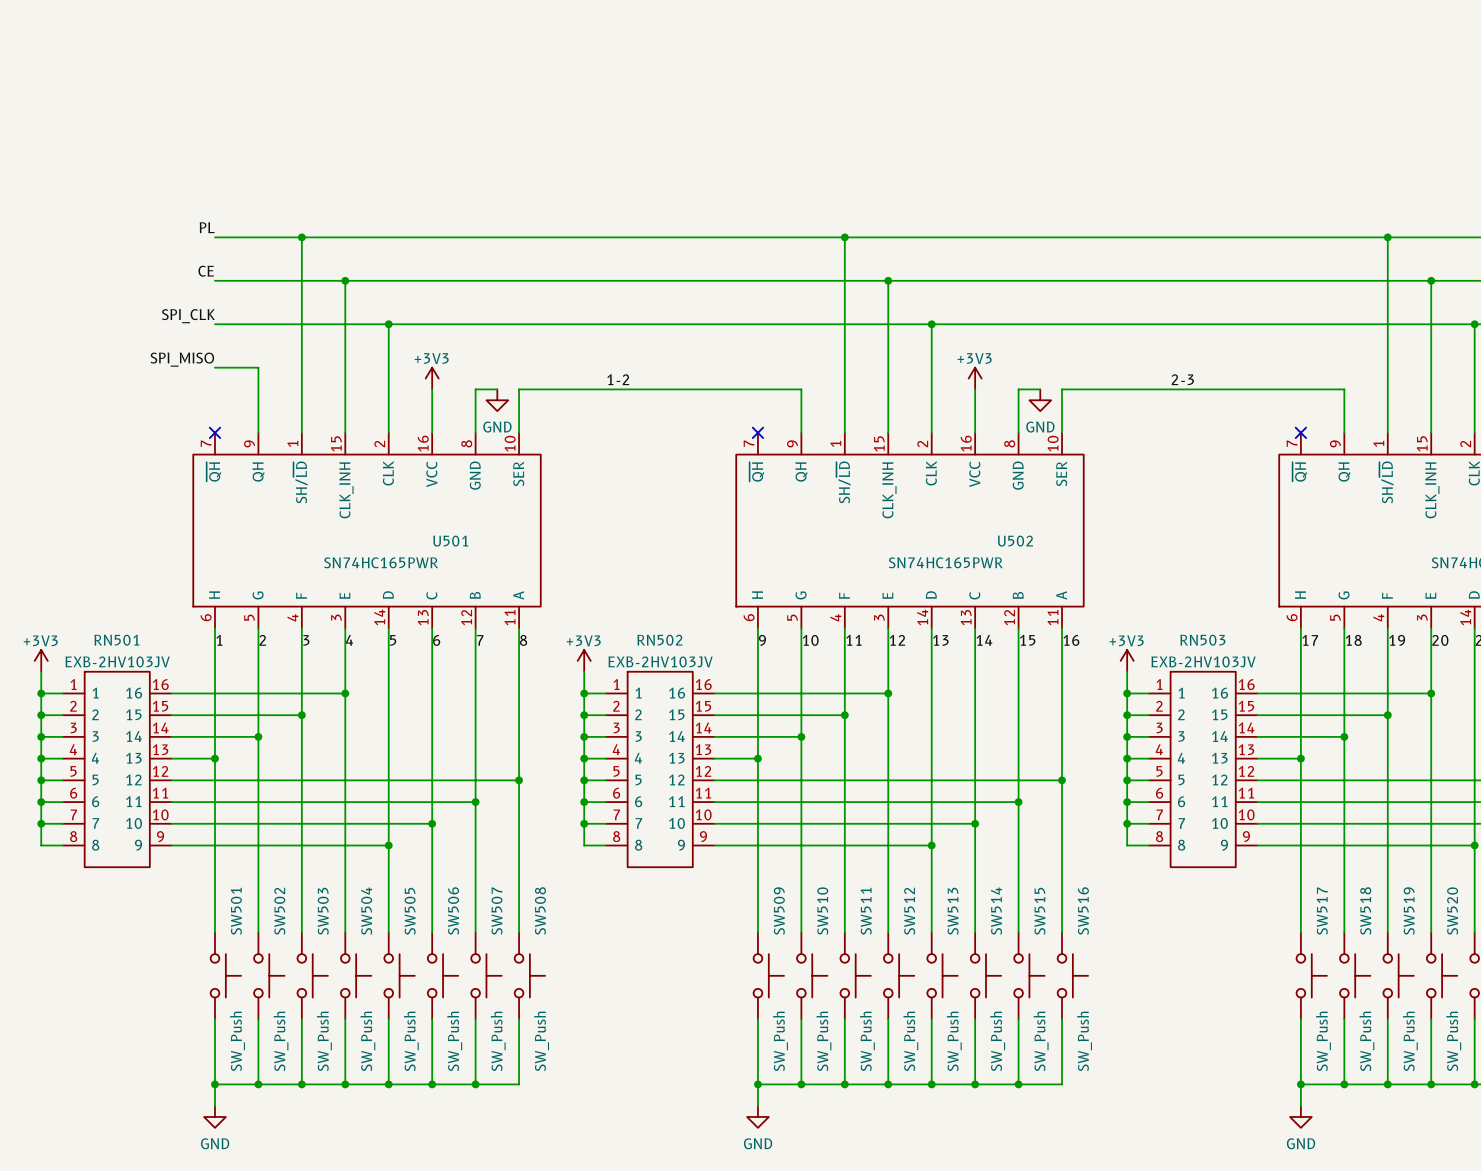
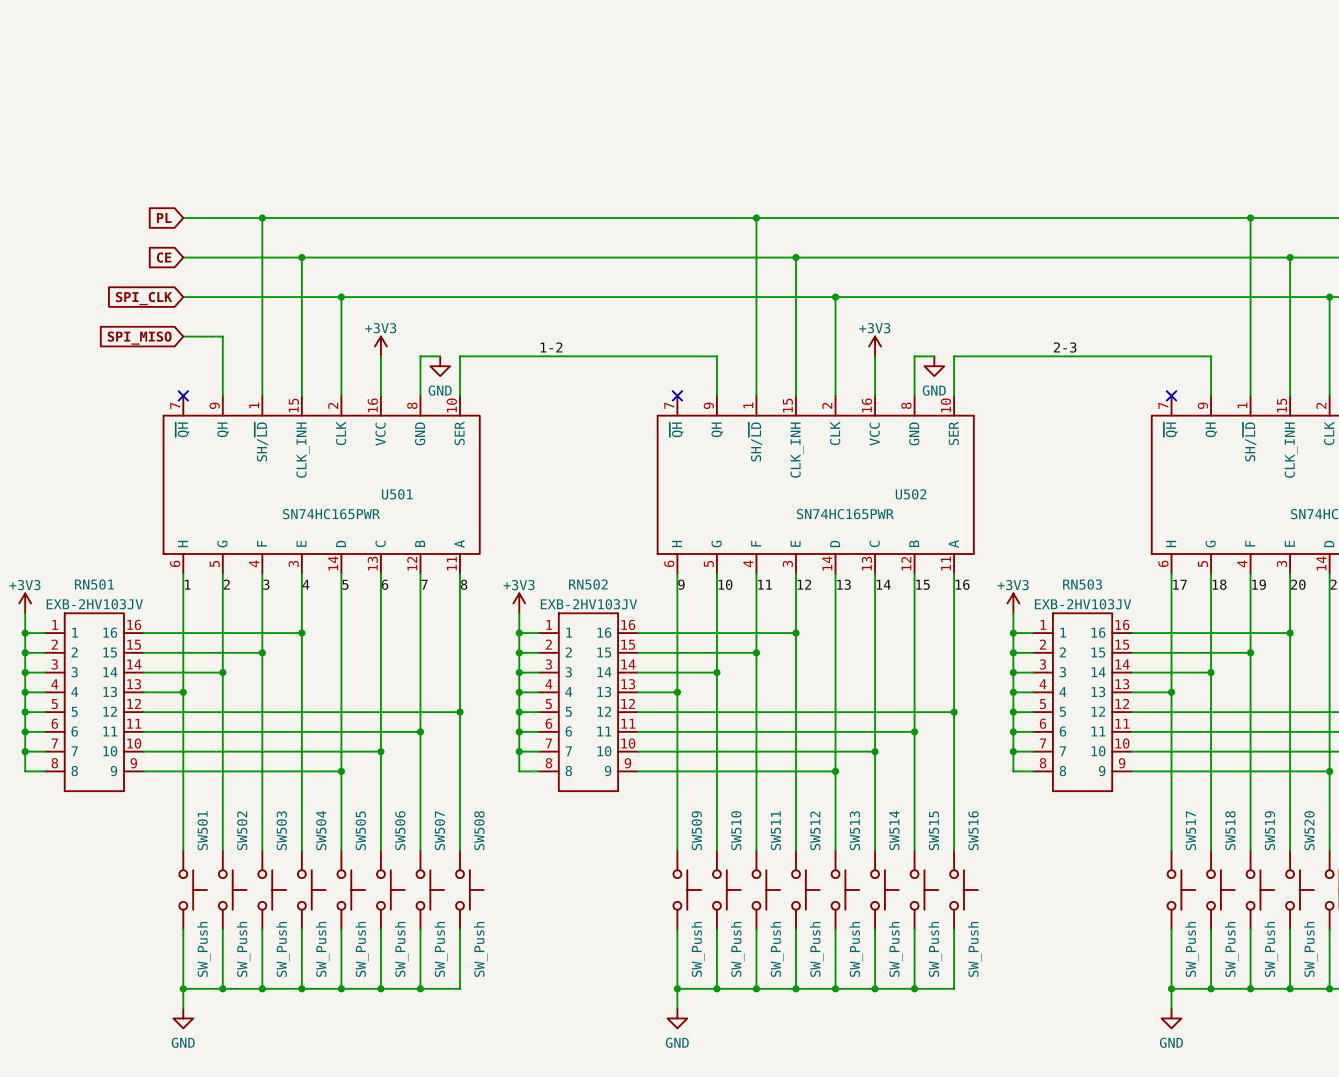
label: PL (207, 227) -> none
global label: none -> PL (164, 218)
label: CE (206, 271) -> none
global label: none -> CE (164, 257)
label: SPI_CLK (188, 316) -> none
global label: none -> SPI_CLK (144, 298)
label: SPI_MISO (182, 359) -> none
global label: none -> SPI_MISO (139, 338)

